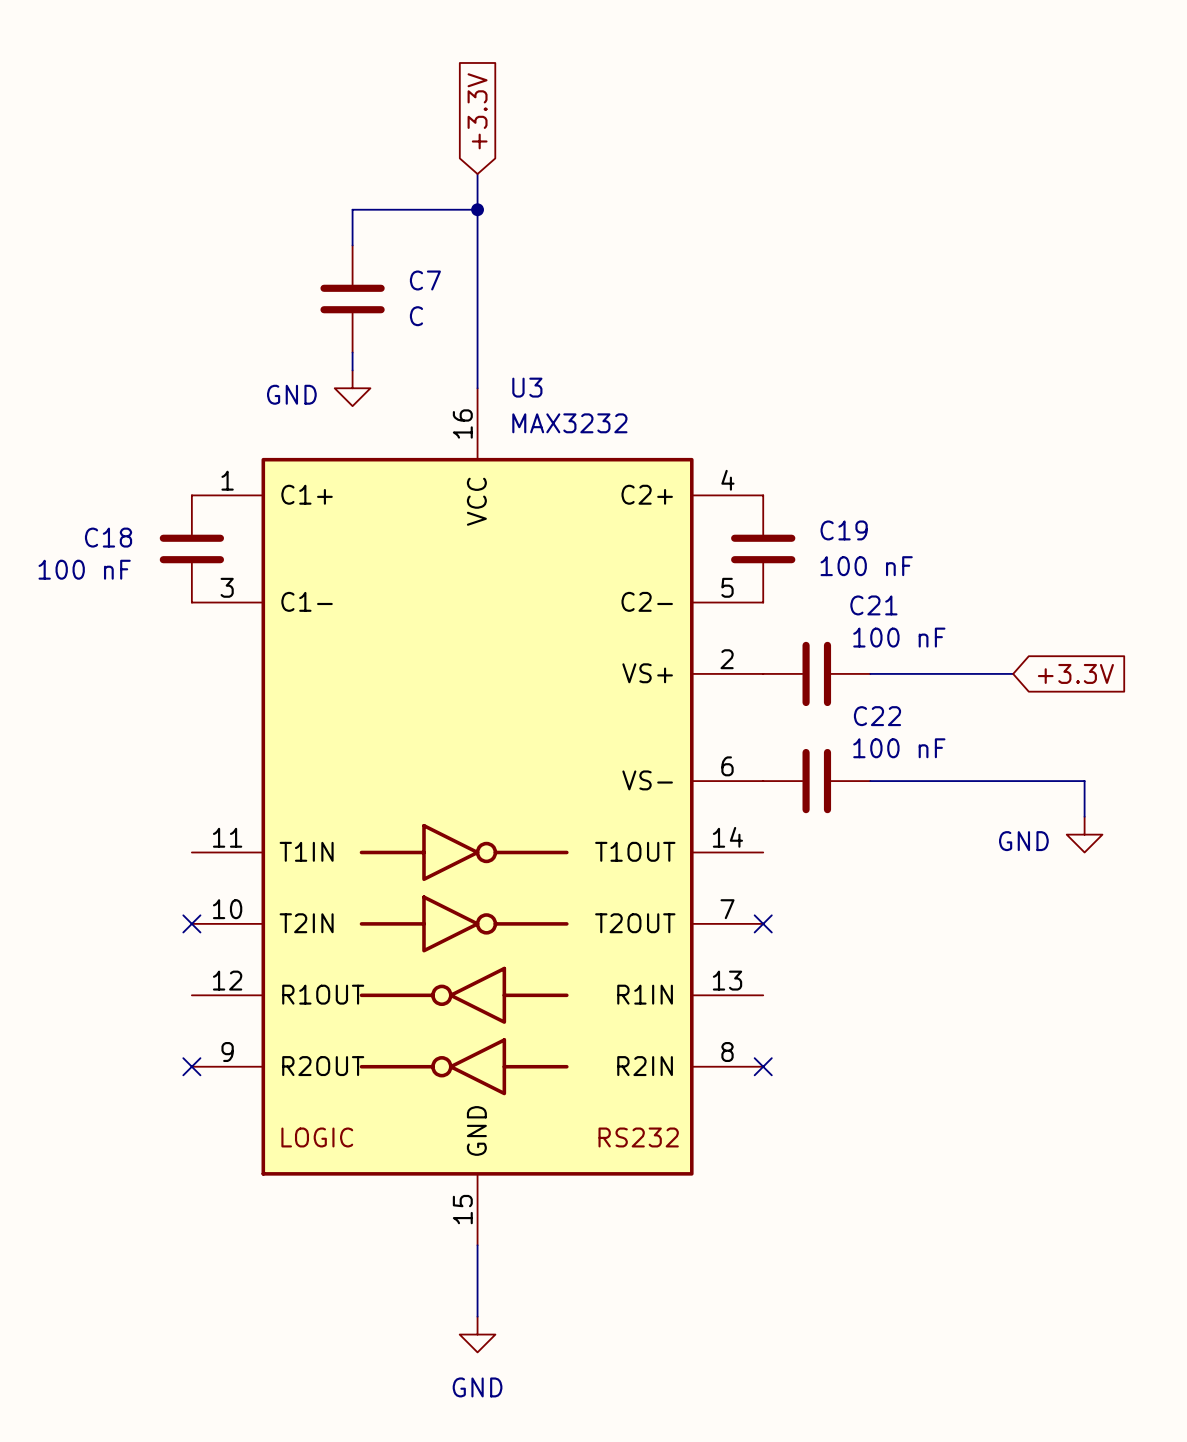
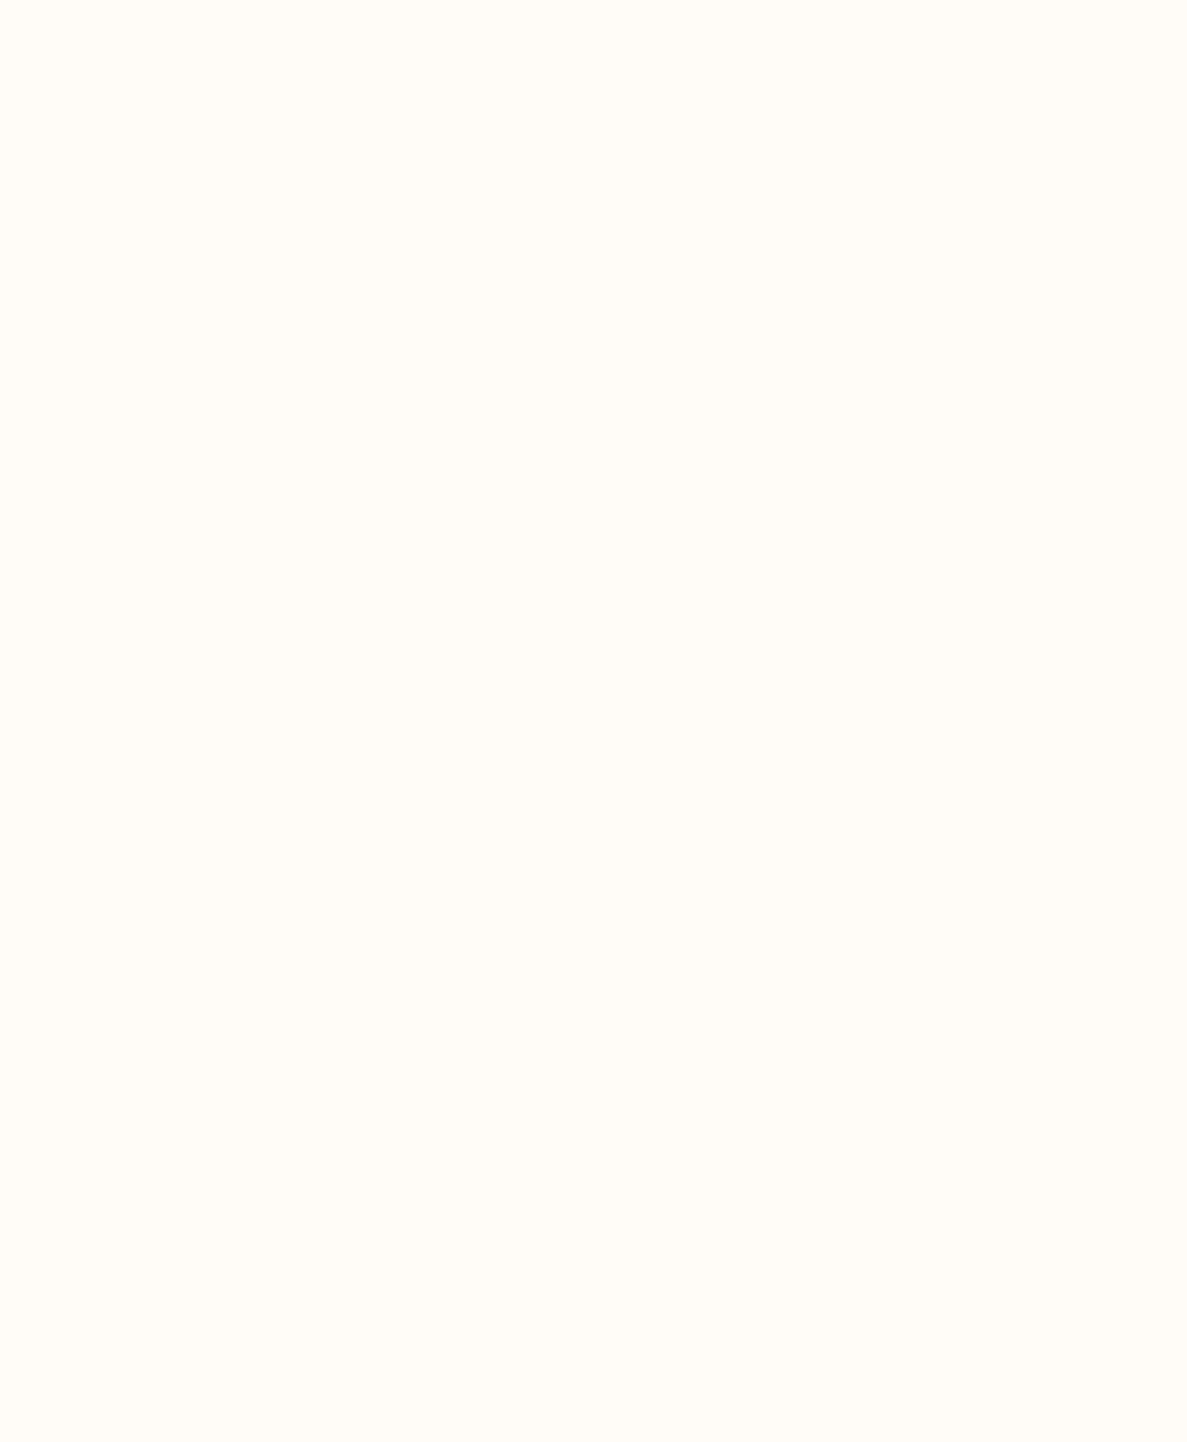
global label: +3.3V (477, 111) -> none
wire: (477, 174) (477, 388) -> none
wire: (477, 209) (352, 209) (352, 245) -> none
junction: (477, 209) -> none
C7: C (352, 299) -> none
wire: (352, 352) (352, 370) -> none
power symbol: GND (352, 388) -> none
C18: 100 nF (191, 548) -> none
C19: 100 nF (763, 548) -> none
C21: 100 nF (816, 673) -> none
wire: (870, 673) (1013, 673) -> none
global label: +3.3V (1075, 673) -> none
C22: 100 nF (816, 781) -> none
wire: (870, 781) (1084, 781) (1084, 816) -> none
U3: MAX3232 (477, 816) -> none
power symbol: GND (1084, 834) -> none
no-connect mark: (191, 923) -> none
no-connect mark: (763, 923) -> none
no-connect mark: (191, 1066) -> none
no-connect mark: (763, 1066) -> none
wire: (477, 1245) (477, 1316) -> none
power symbol: GND (477, 1334) -> none

